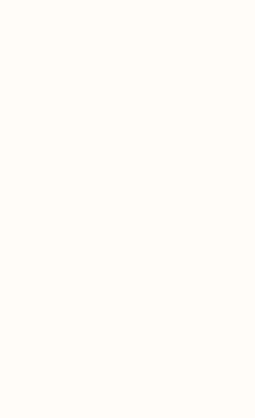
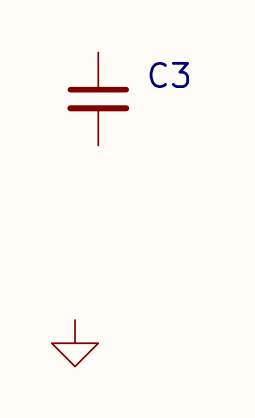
C3: none -> (98, 98)
power symbol: none -> (75, 343)

